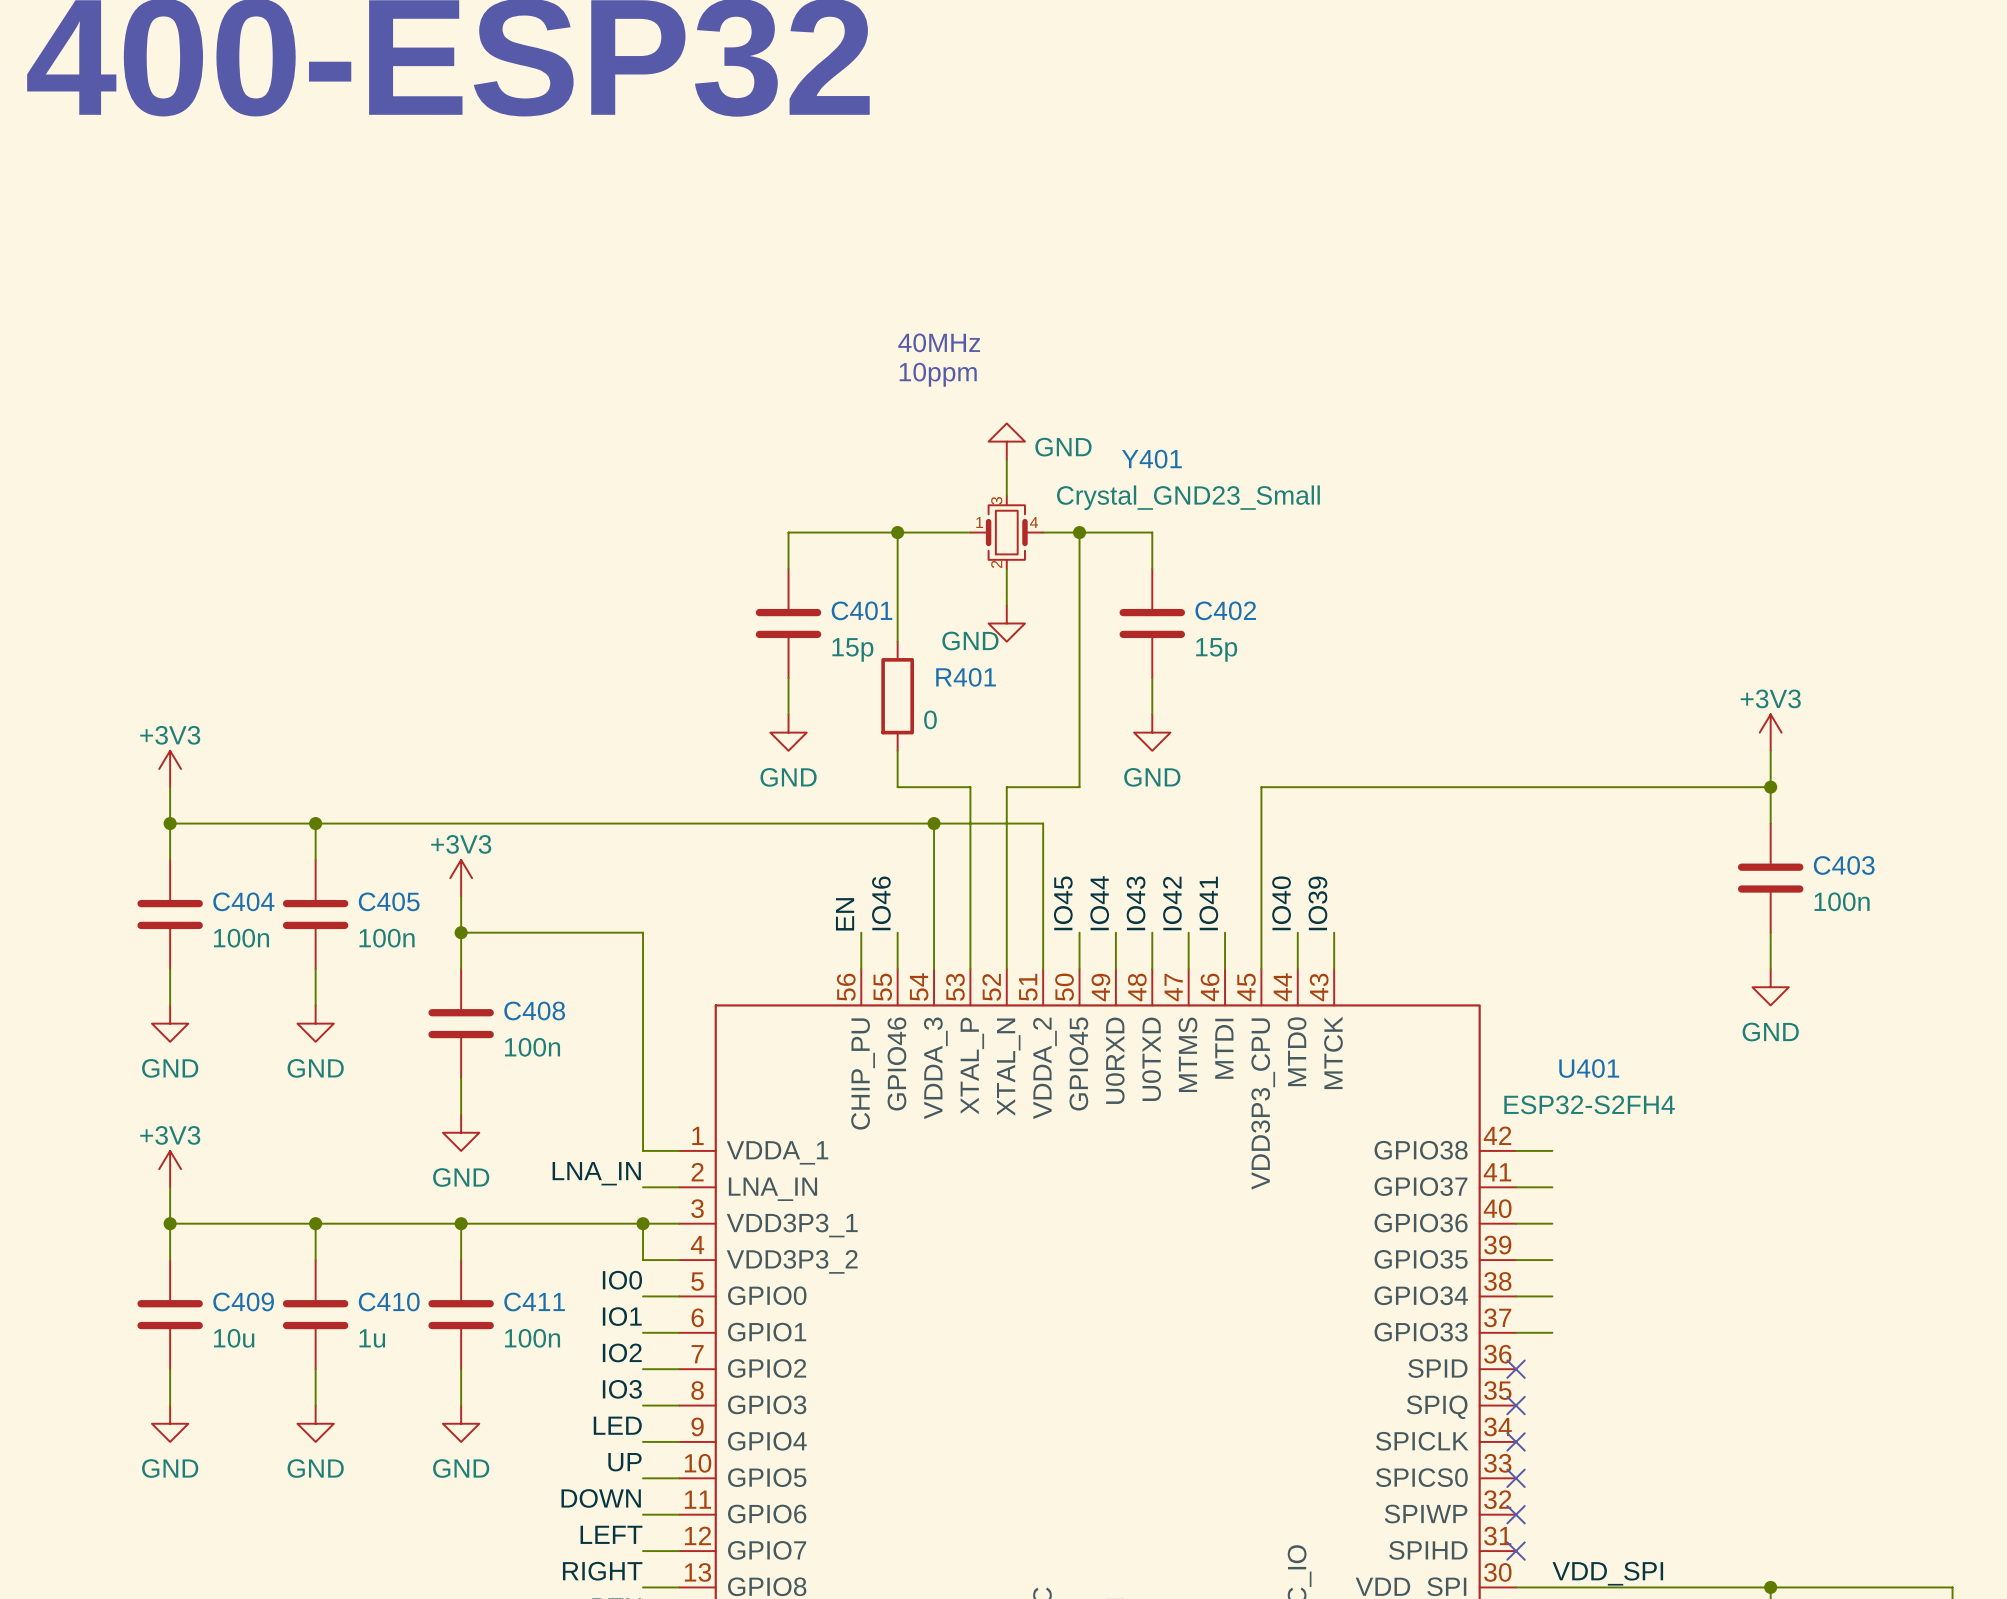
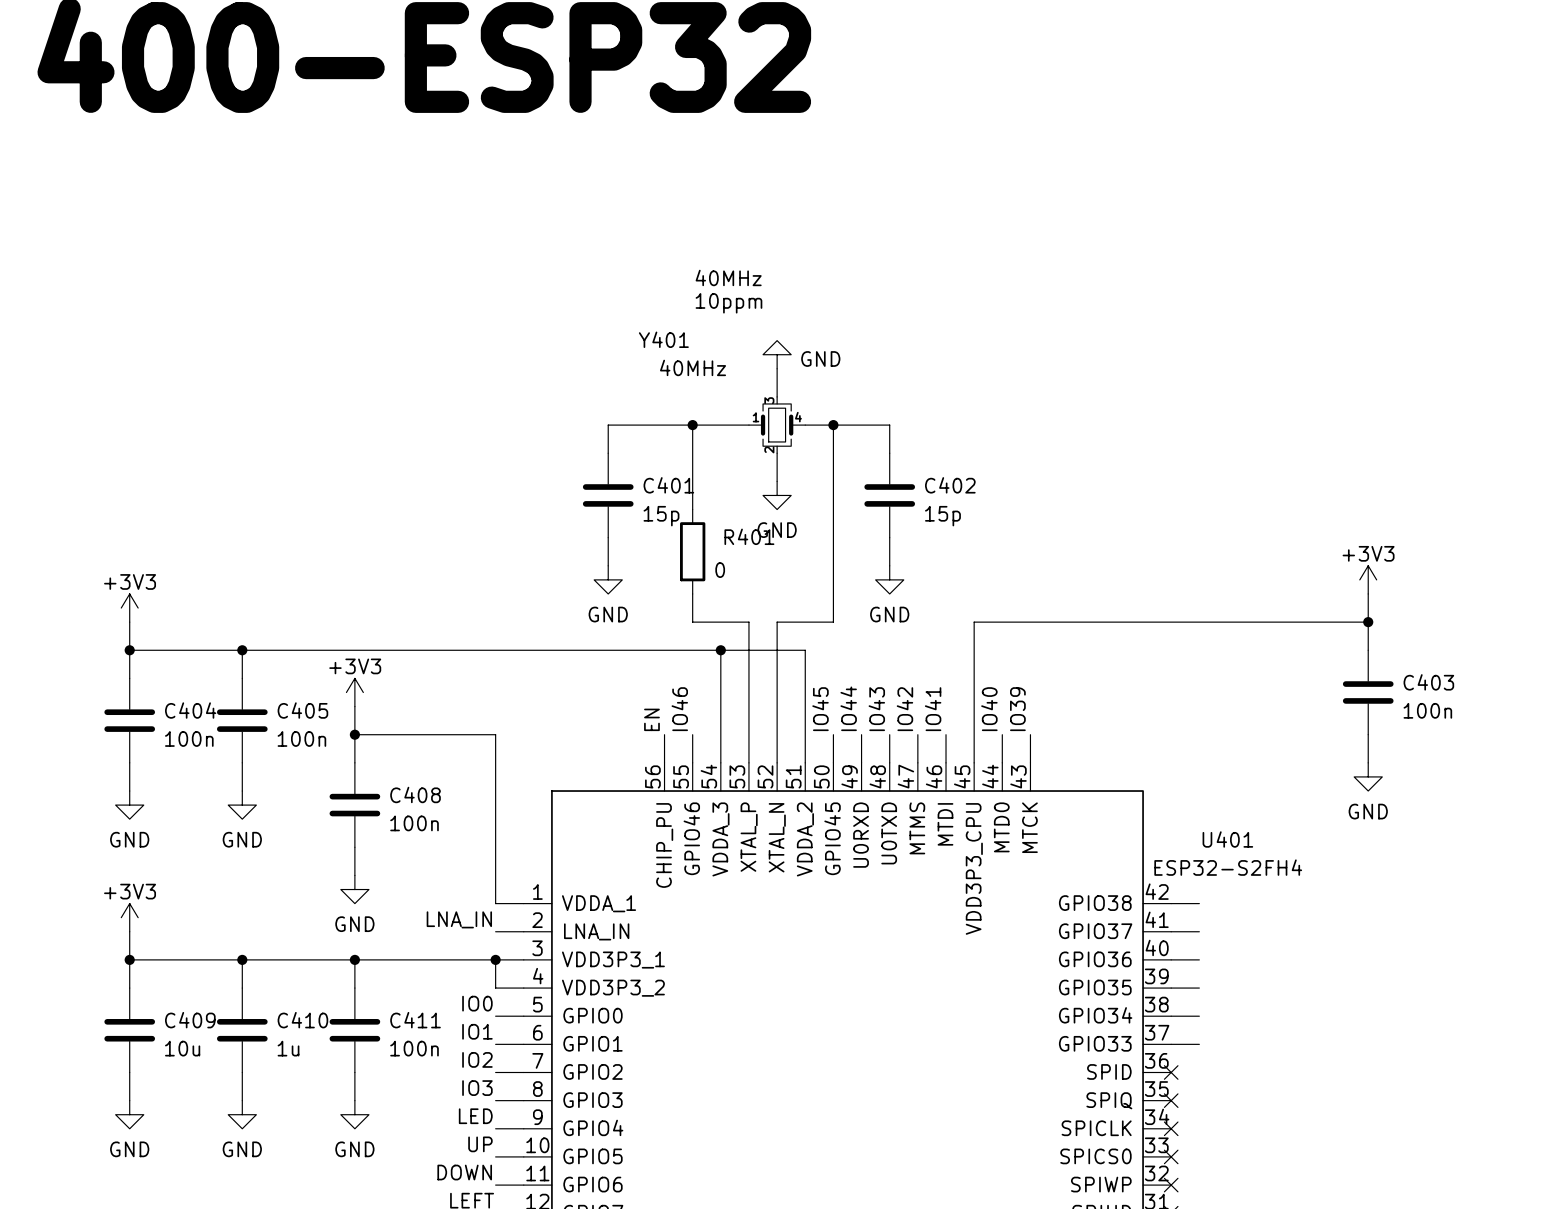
Y401 name position: Y401 (1151, 459) -> Y401 (663, 339)
Y401 value: Crystal_GND23_Small (1188, 497) -> 40MHz (693, 367)
power symbol text position: GND (970, 640) -> GND (777, 530)

